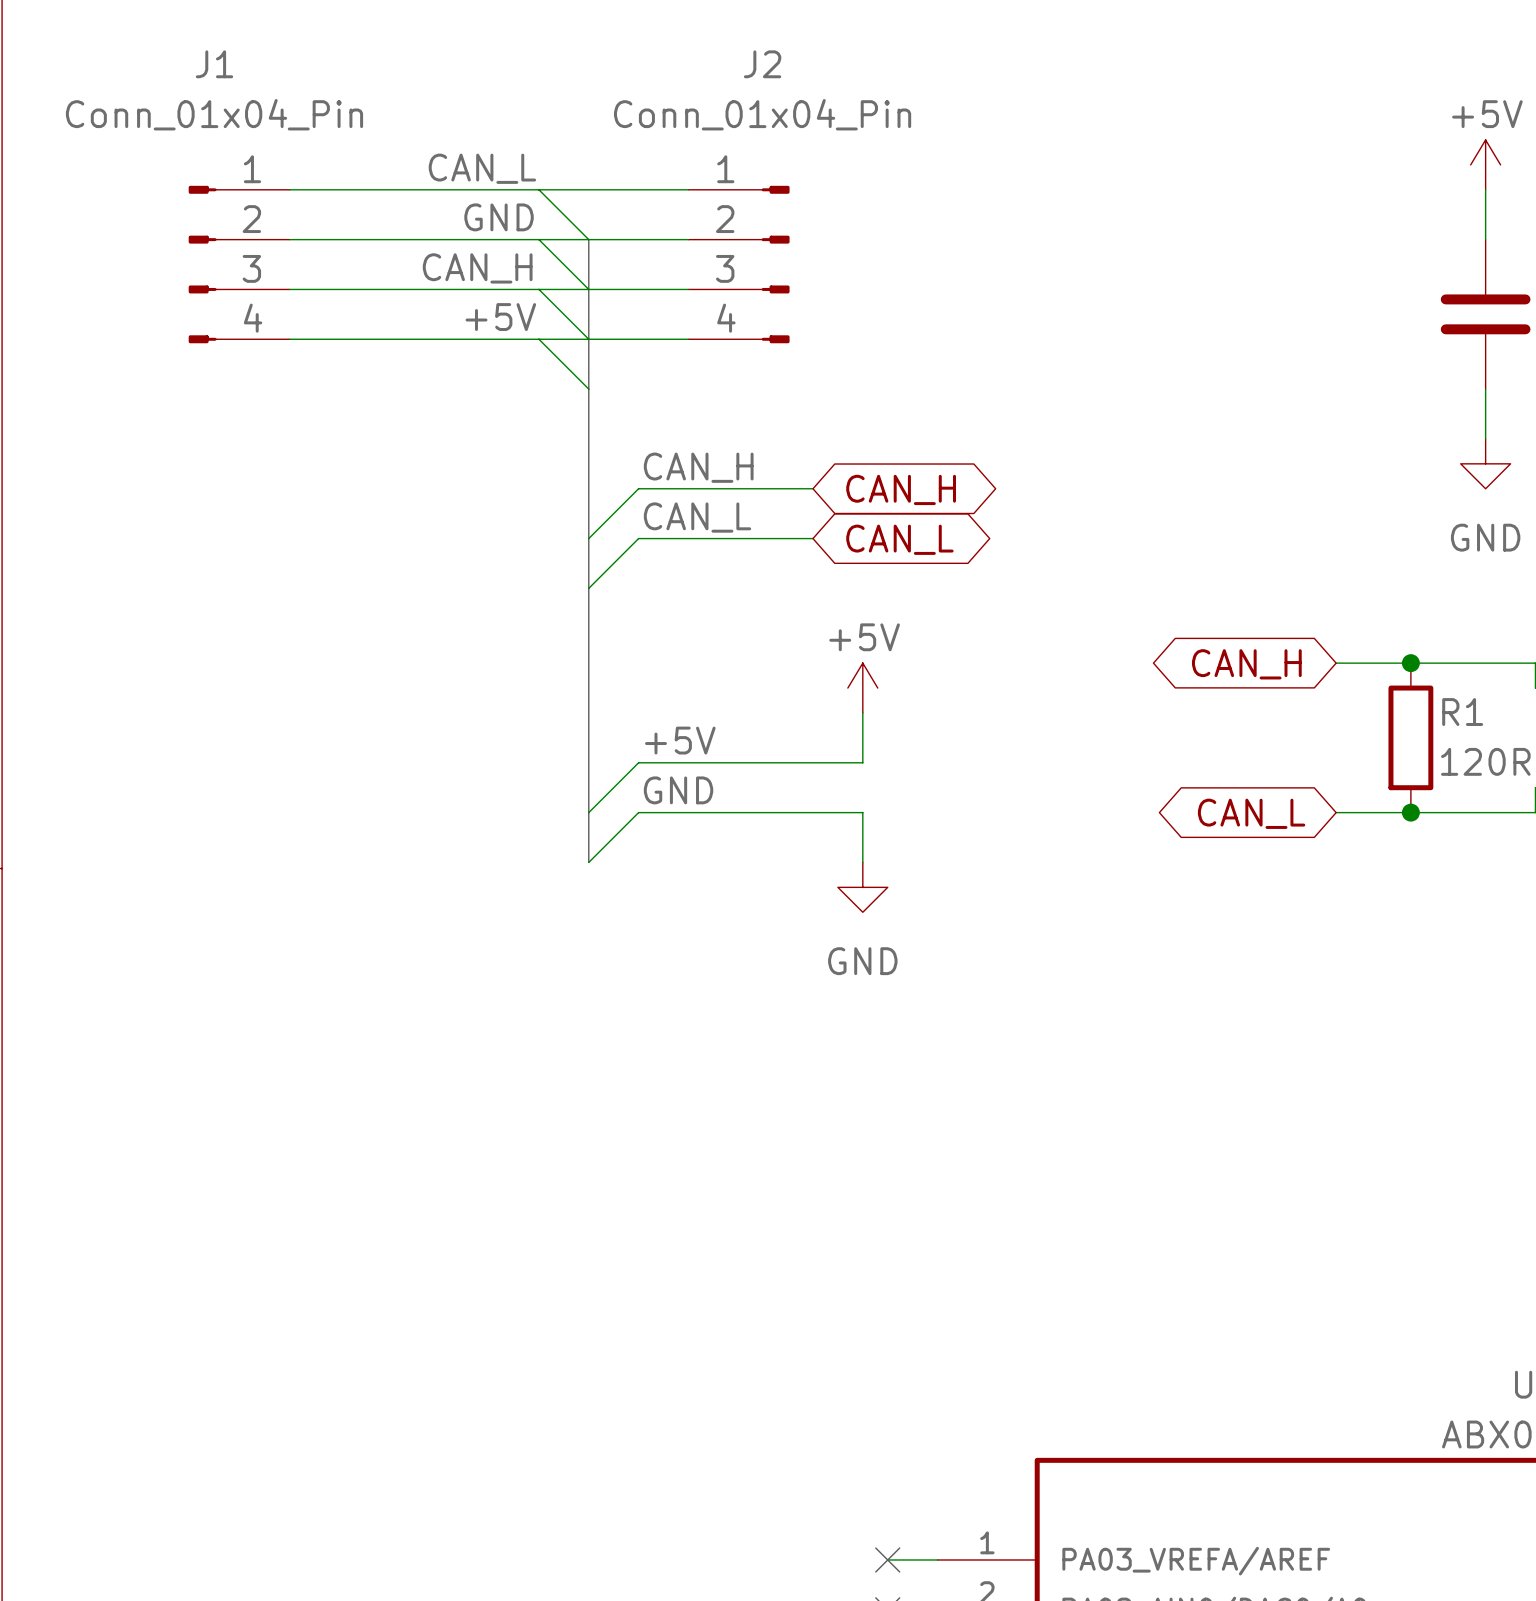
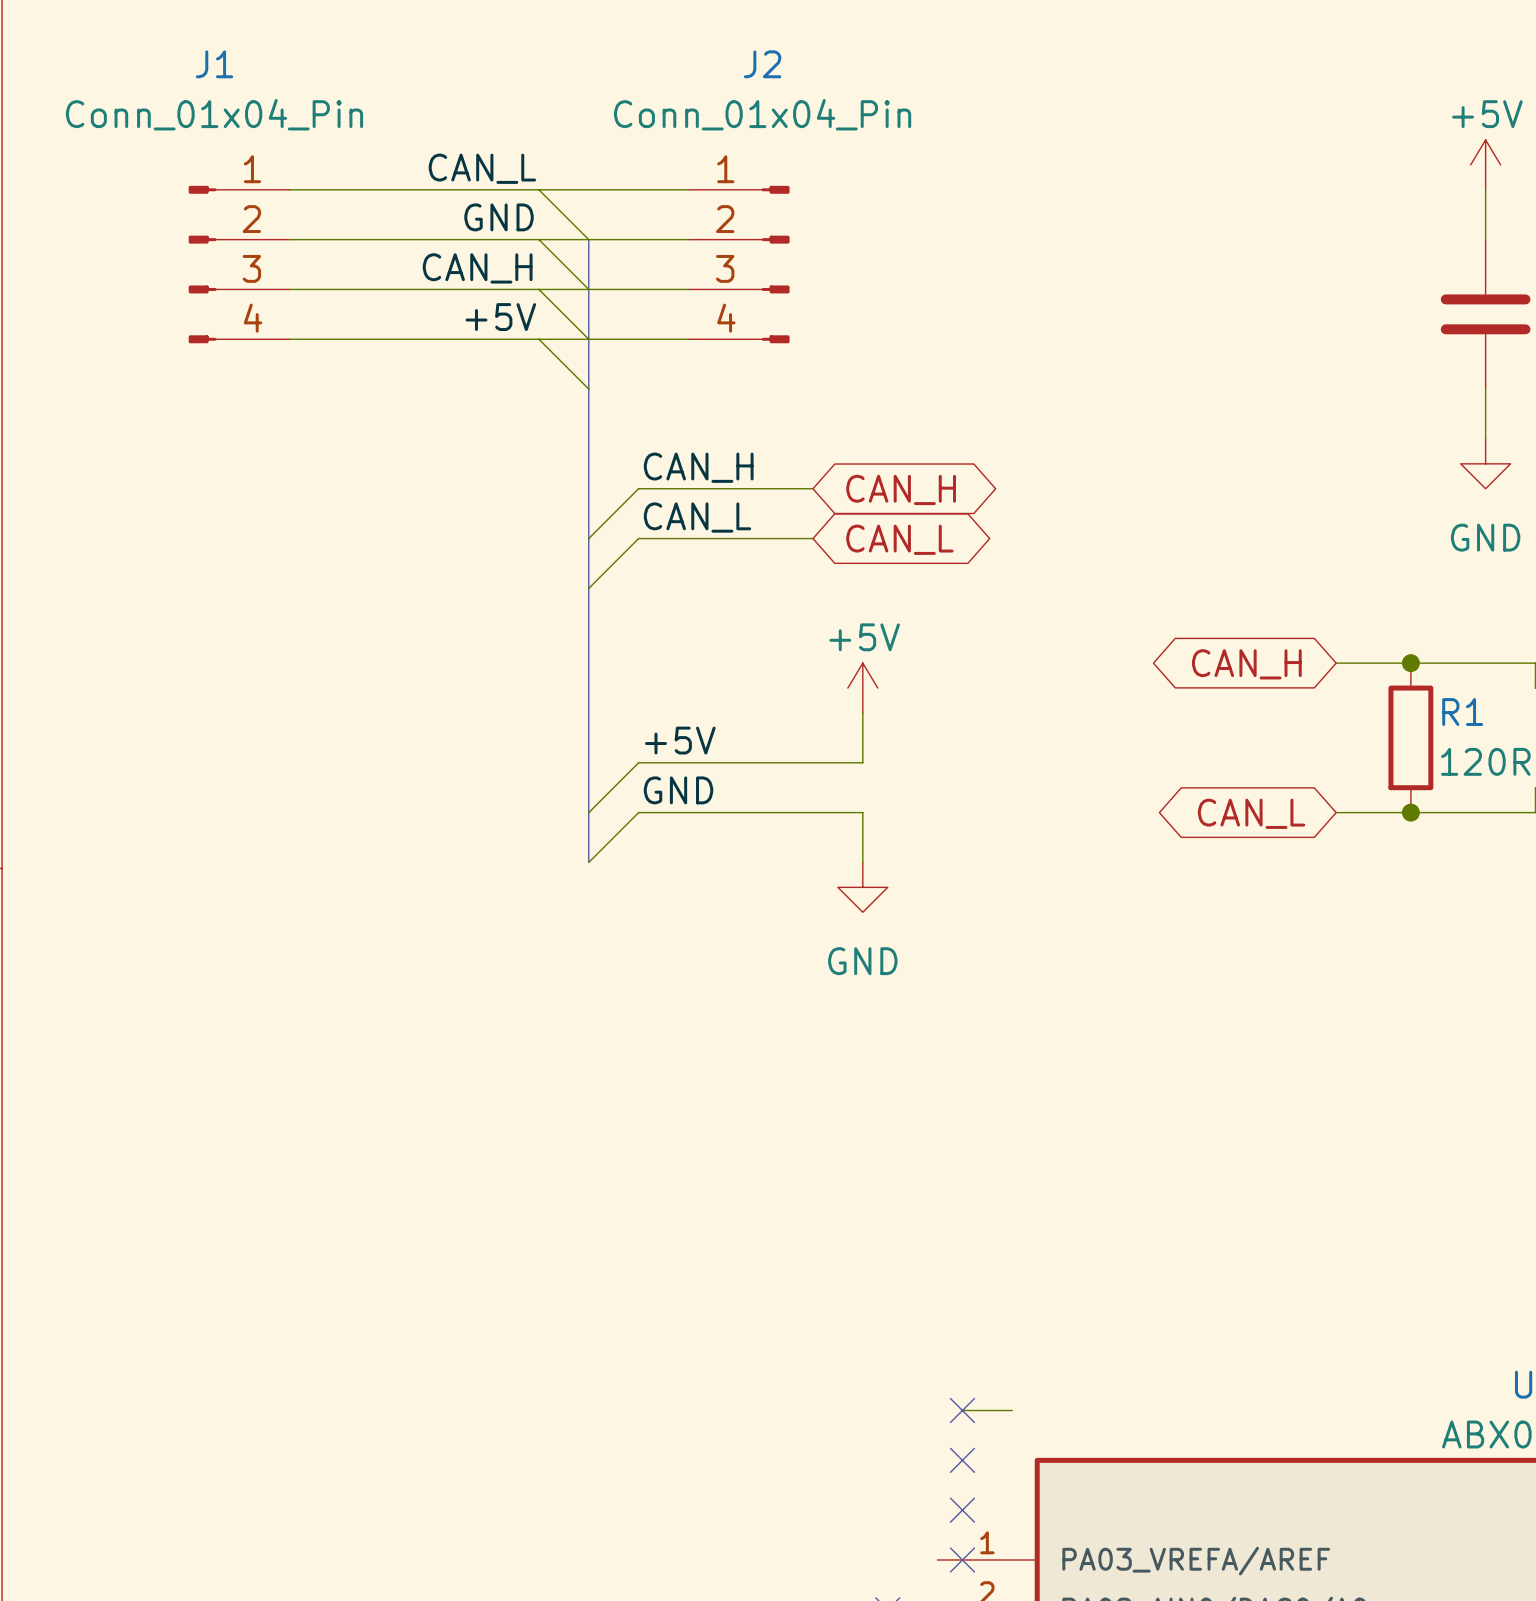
no-connect mark: none -> (962, 1410)
no-connect mark: none -> (962, 1460)
no-connect mark: none -> (962, 1510)
wire: (887, 1559) (937, 1559) -> (962, 1410) (1012, 1410)
no-connect mark: (887, 1559) -> none
no-connect mark: none -> (962, 1559)

